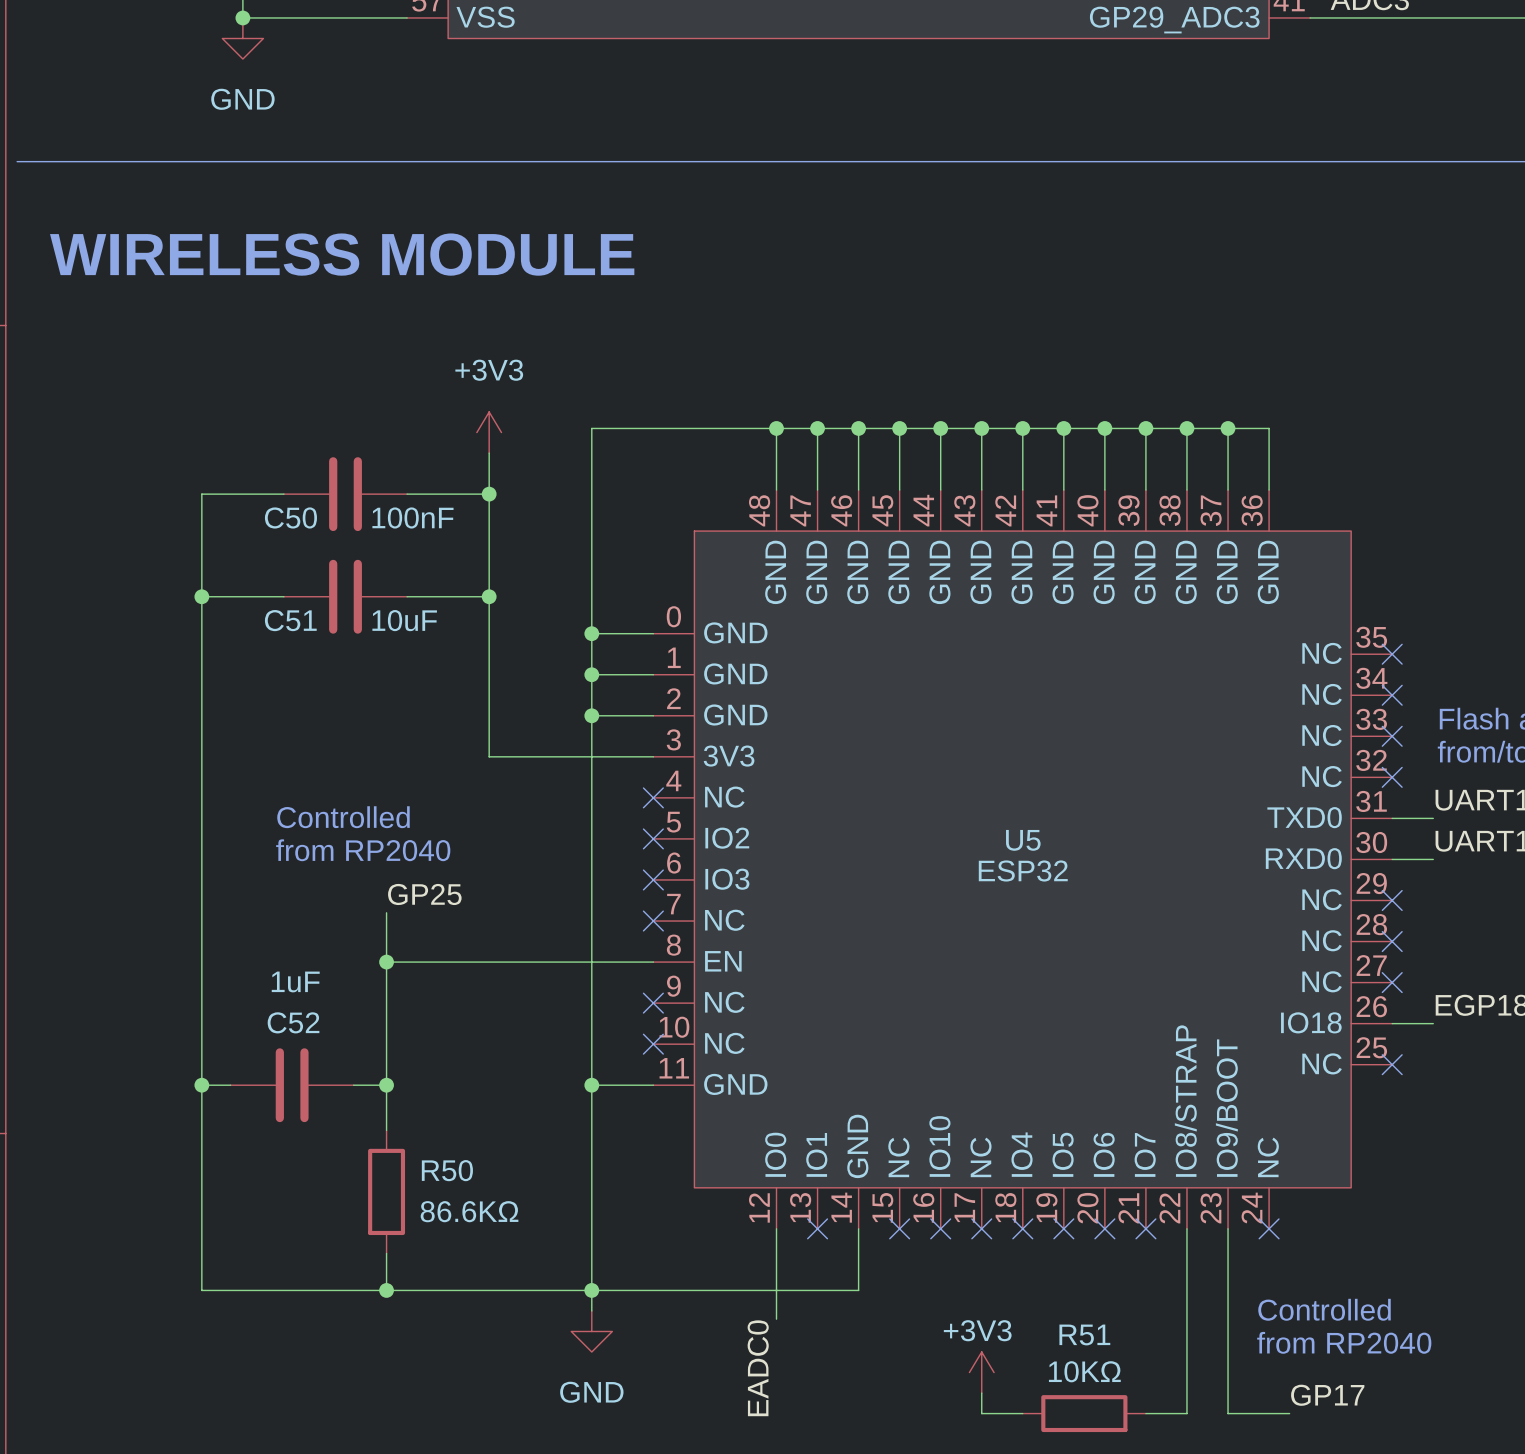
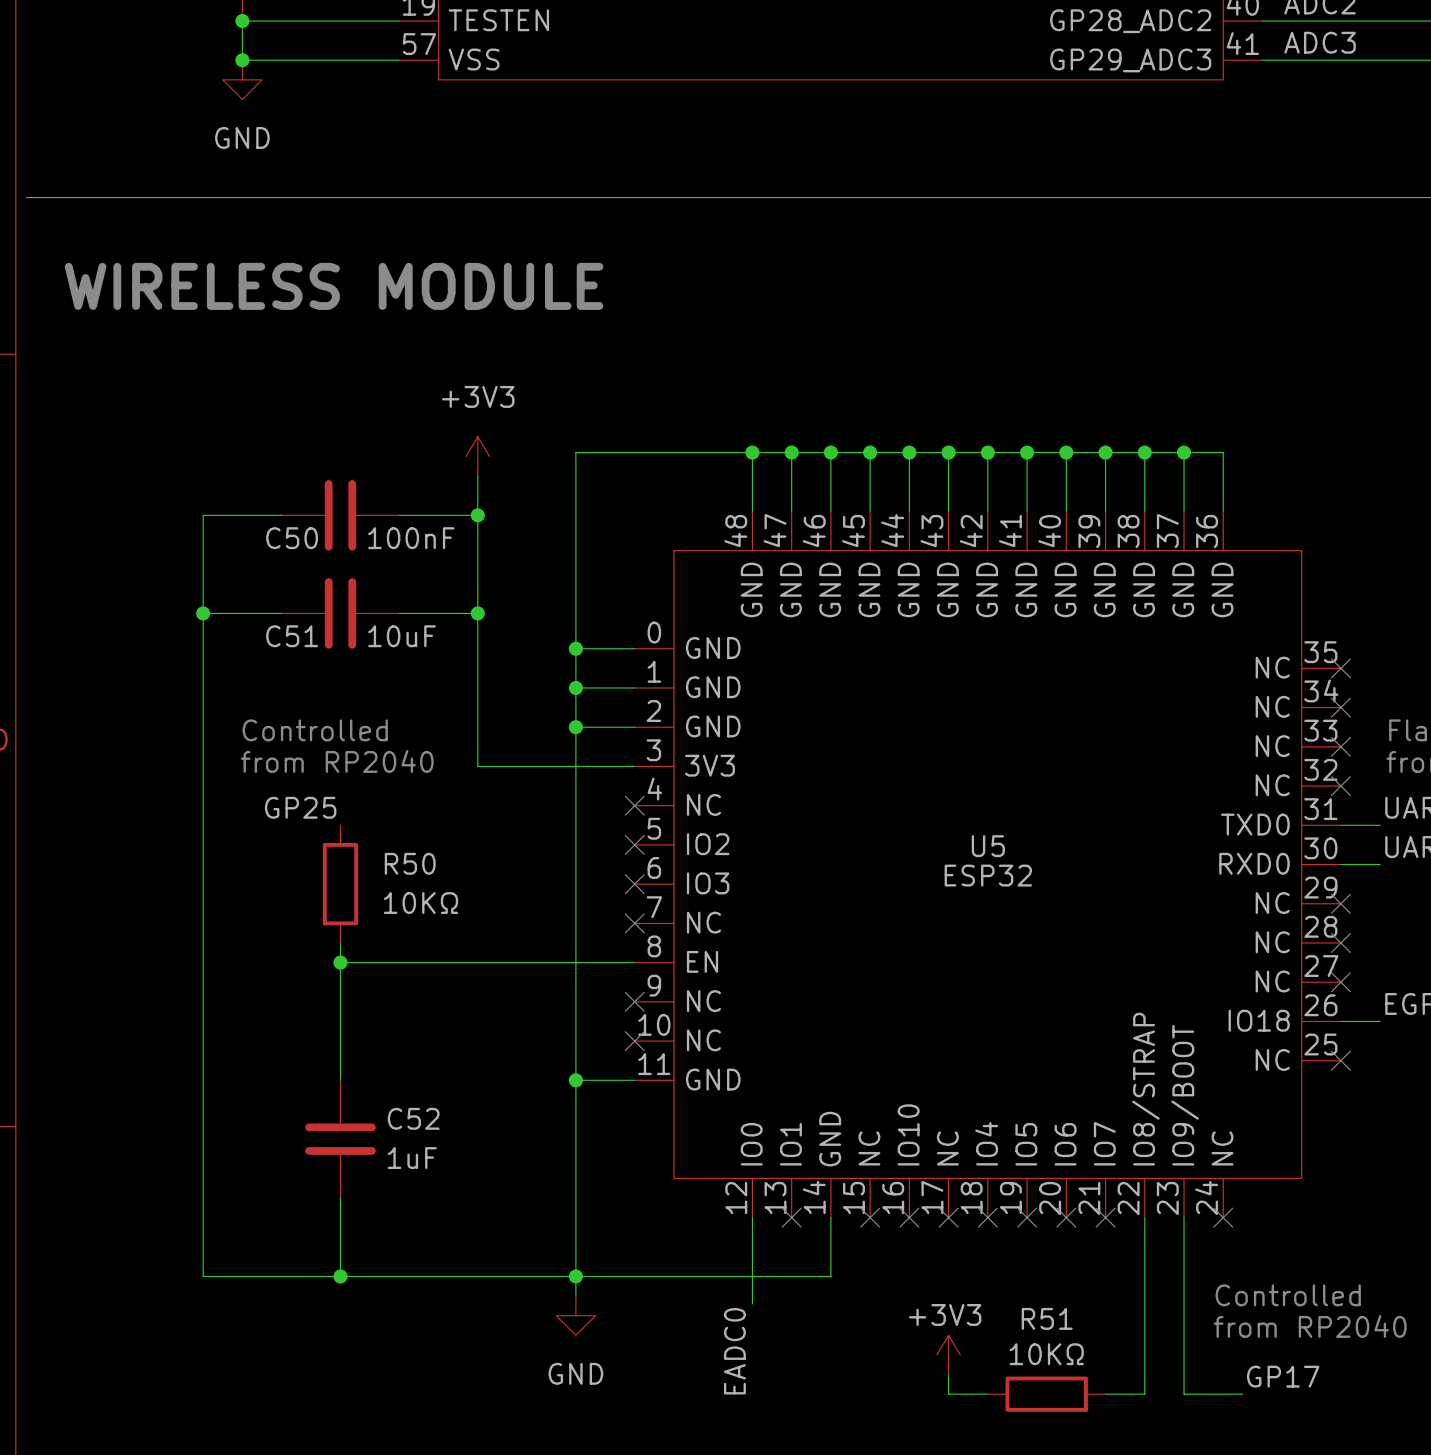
text position: Controlled (343, 817) -> Controlled (315, 730)
text position: from RP2040 (363, 850) -> from RP2040 (337, 761)
label position: GP25 (424, 894) -> GP25 (300, 807)
wire: (386, 912) (386, 1130) -> none
wire: none -> (340, 942) (340, 1080)
wire: none -> (340, 962) (379, 962)
junction position: (386, 962) -> (340, 962)
C52 value position: 1uF (295, 981) -> 1uF (412, 1158)
wire: (201, 1085) (230, 1085) -> none
junction: (201, 1085) -> none
C52 rotation: 0° (292, 1085) -> 90° clockwise (340, 1139)
C52 position: (292, 1085) -> (340, 1139)
wire: (353, 1085) (386, 1085) -> none
junction: (386, 1085) -> none
R50 name position: R50 (447, 1170) -> R50 (410, 863)
R50 position: (386, 1191) -> (340, 884)
wire: none -> (340, 1198) (340, 1276)
R50 value: 86.6KΩ (469, 1211) -> 10KΩ (420, 903)
wire: (386, 1253) (386, 1290) -> none
junction position: (386, 1290) -> (340, 1276)

